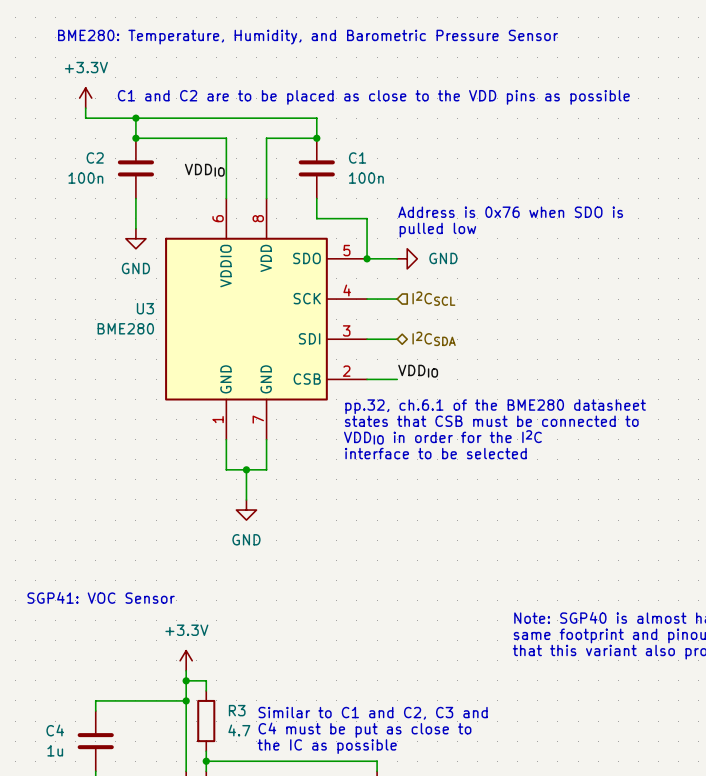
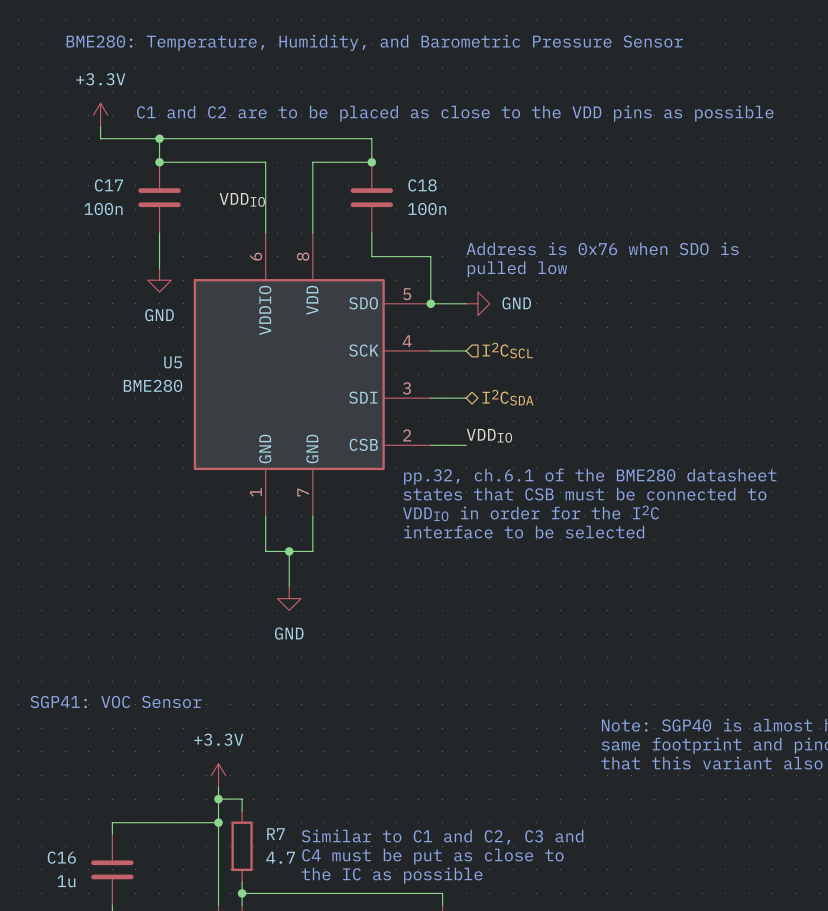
C2 name: C2 (95, 157) -> C17 (108, 185)
C1 name: C1 (357, 157) -> C18 (422, 185)
U3 name: U3 (145, 308) -> U5 (173, 362)
R3 name: R3 (237, 710) -> R7 (275, 834)
C4 name: C4 (55, 730) -> C16 (61, 857)

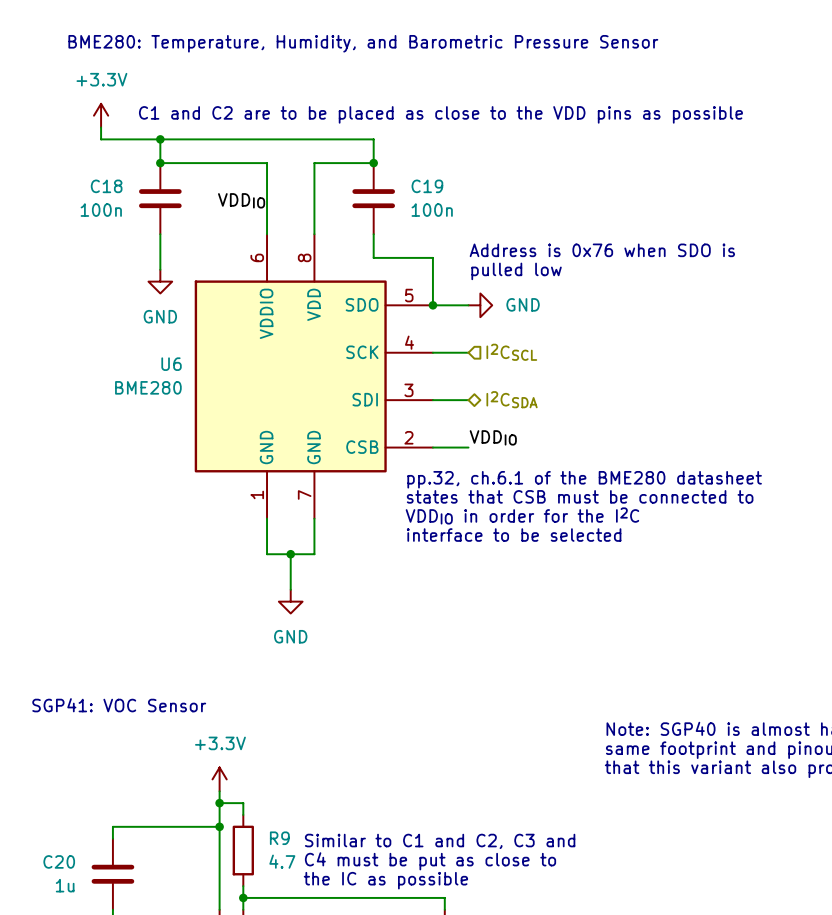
C17 name: C17 (108, 185) -> C18 (106, 186)
C18 name: C18 (422, 185) -> C19 (427, 186)
U5 name: U5 (173, 362) -> U6 (171, 364)
R7 name: R7 (275, 834) -> R9 (279, 838)
C16 name: C16 (61, 857) -> C20 (59, 861)

